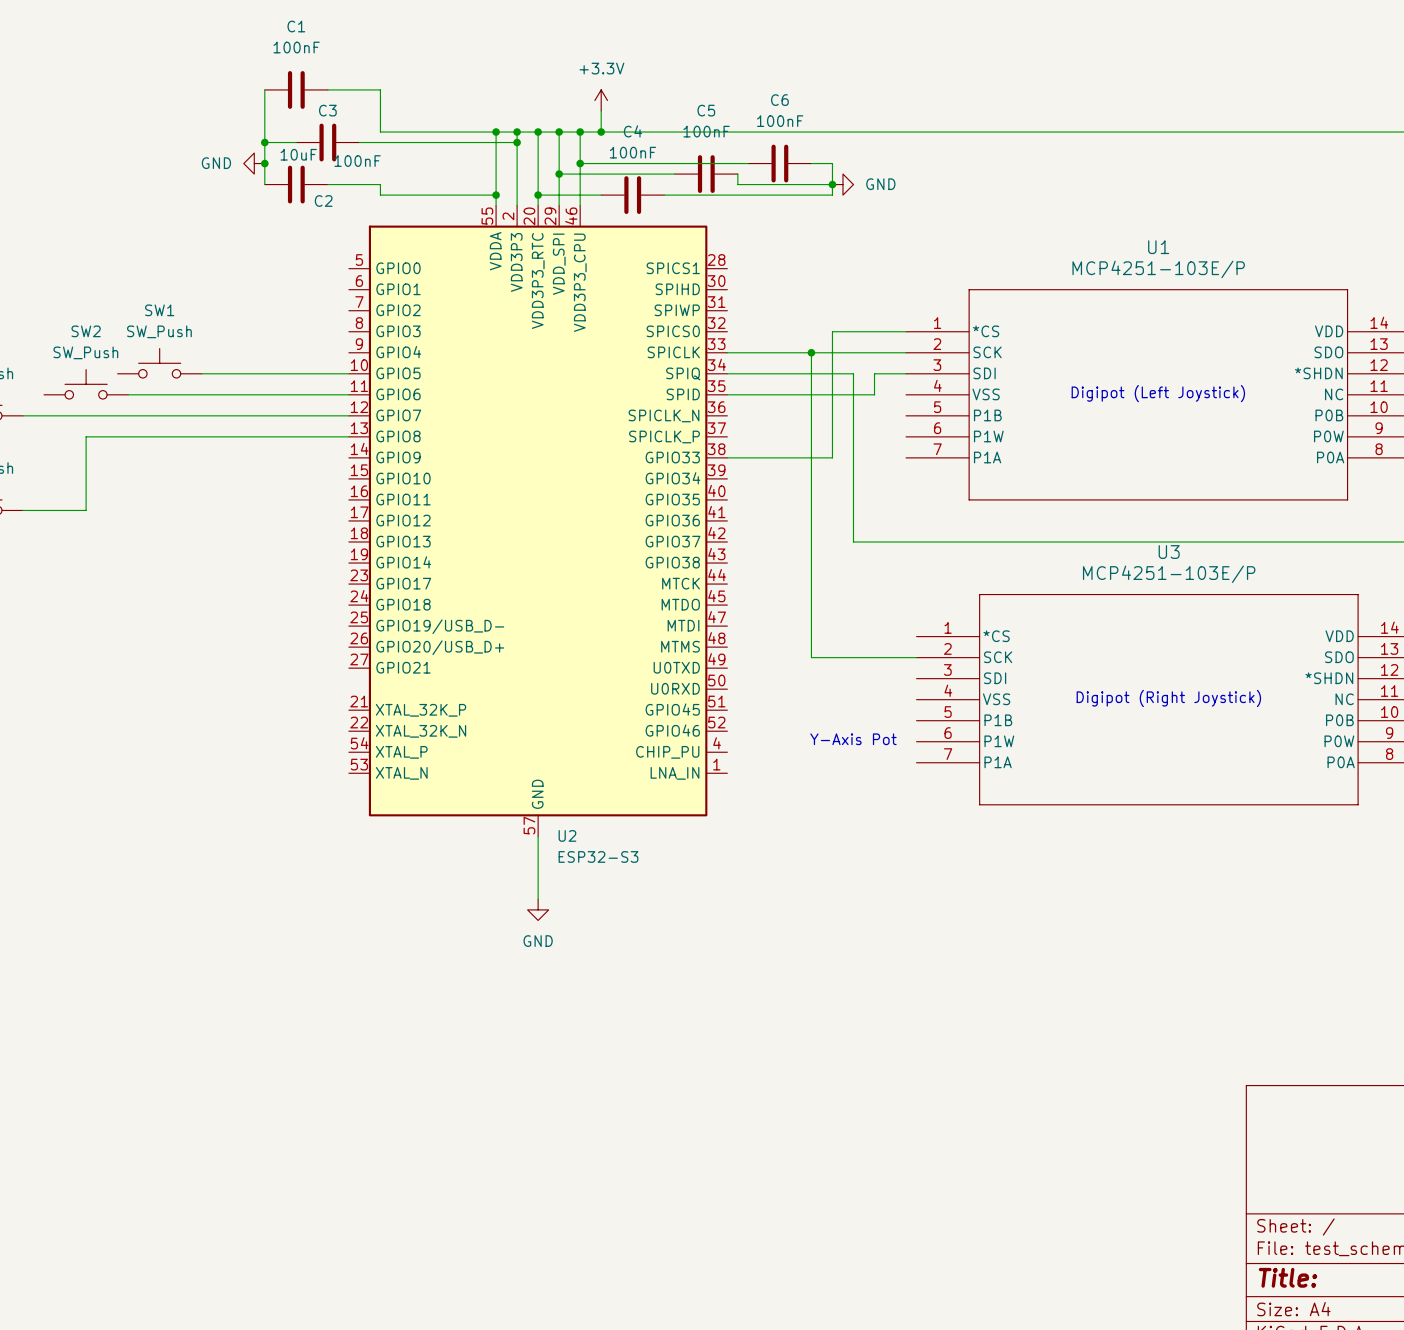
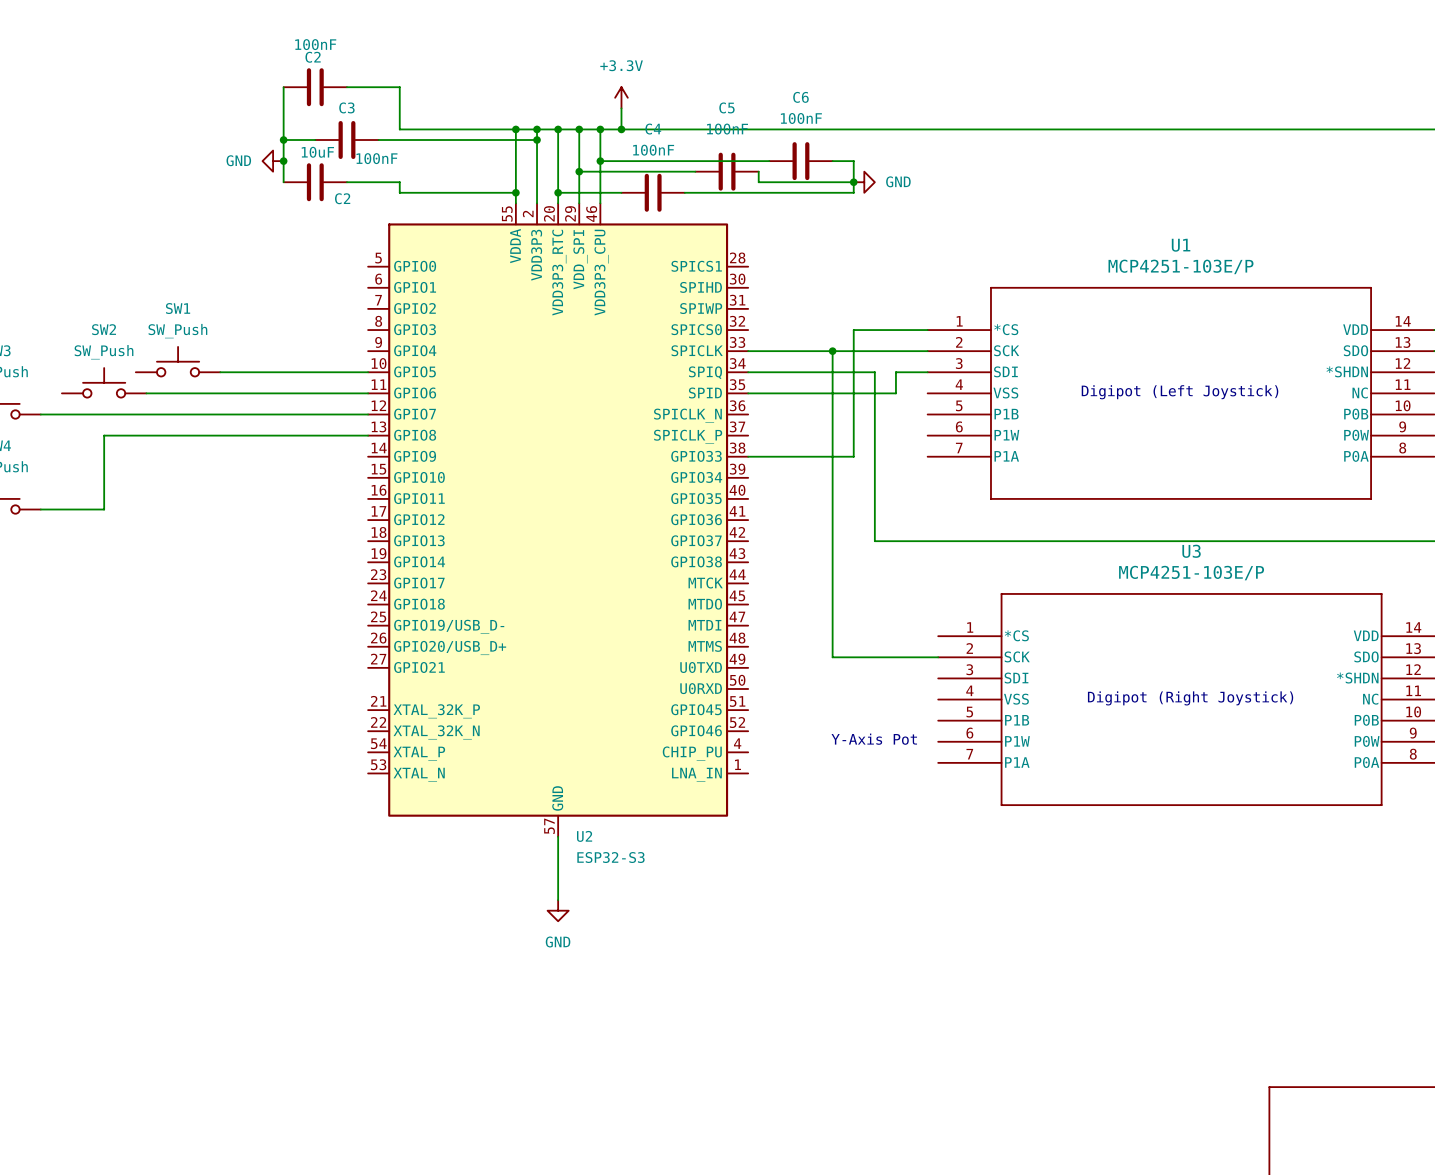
C1 name: C1 (296, 26) -> C2 (313, 57)

